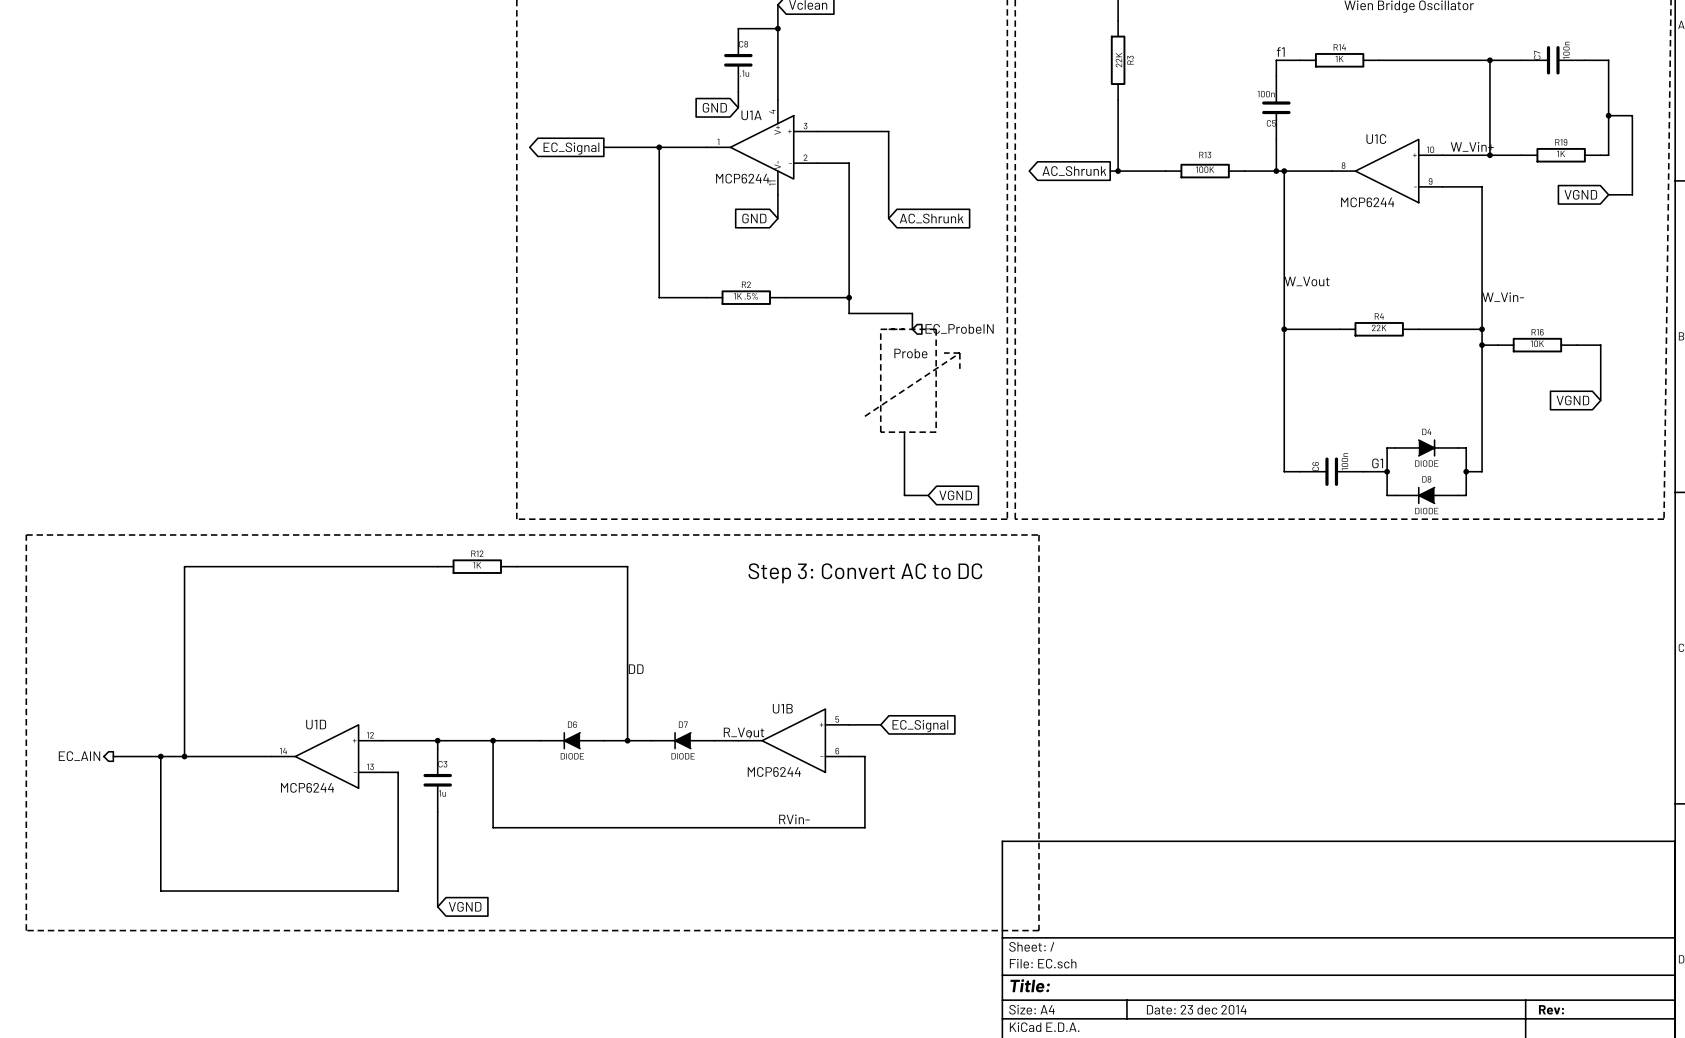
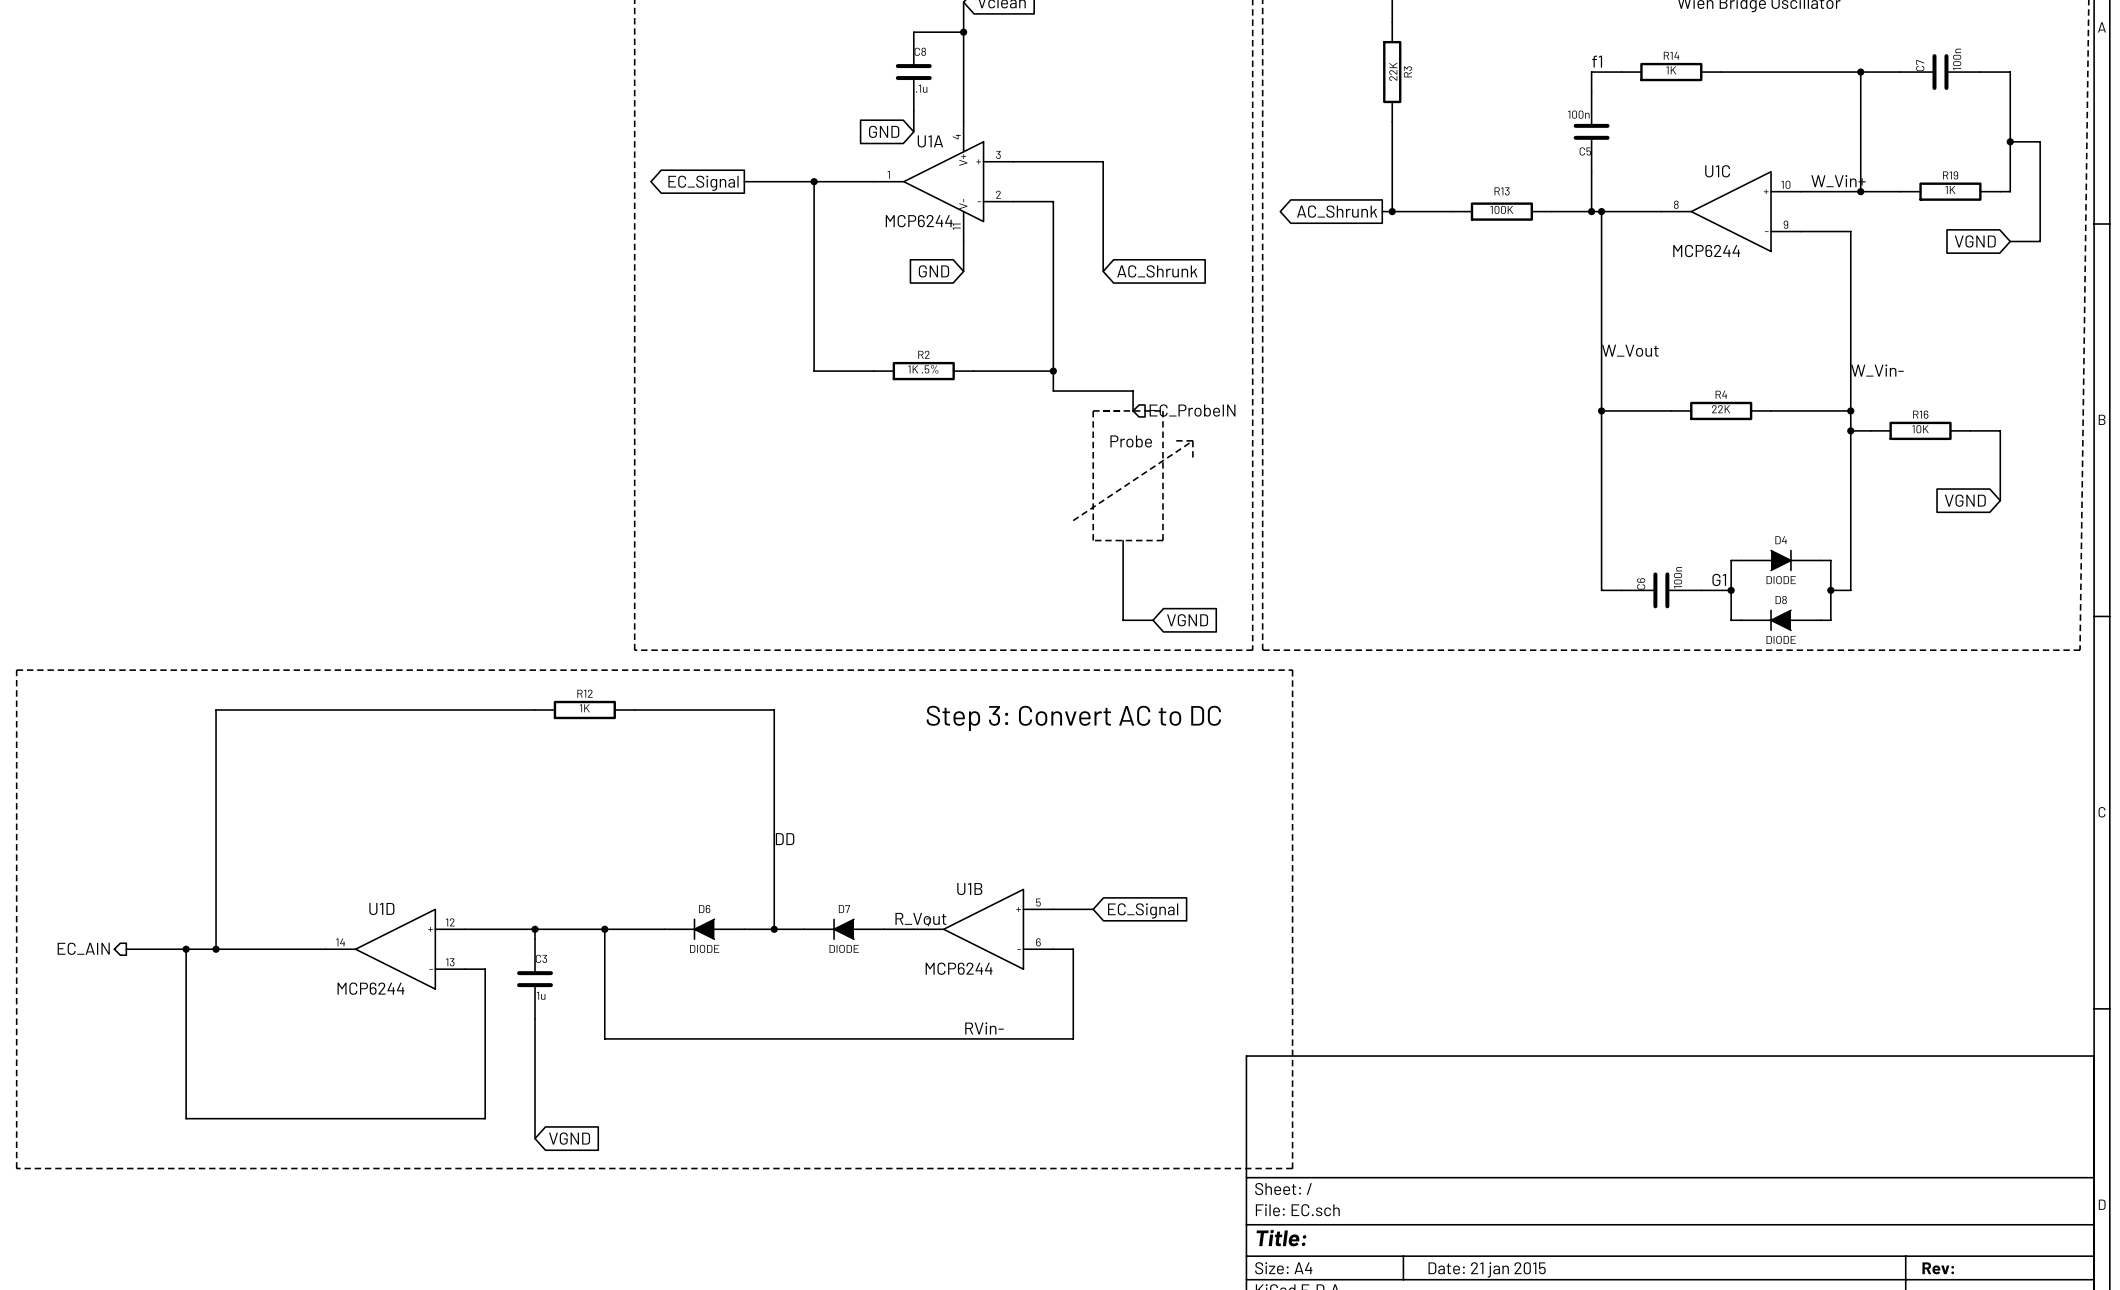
title block: Date: 23 dec 2014 (1196, 1009) -> Date: 21 jan 2015 (1487, 1269)

